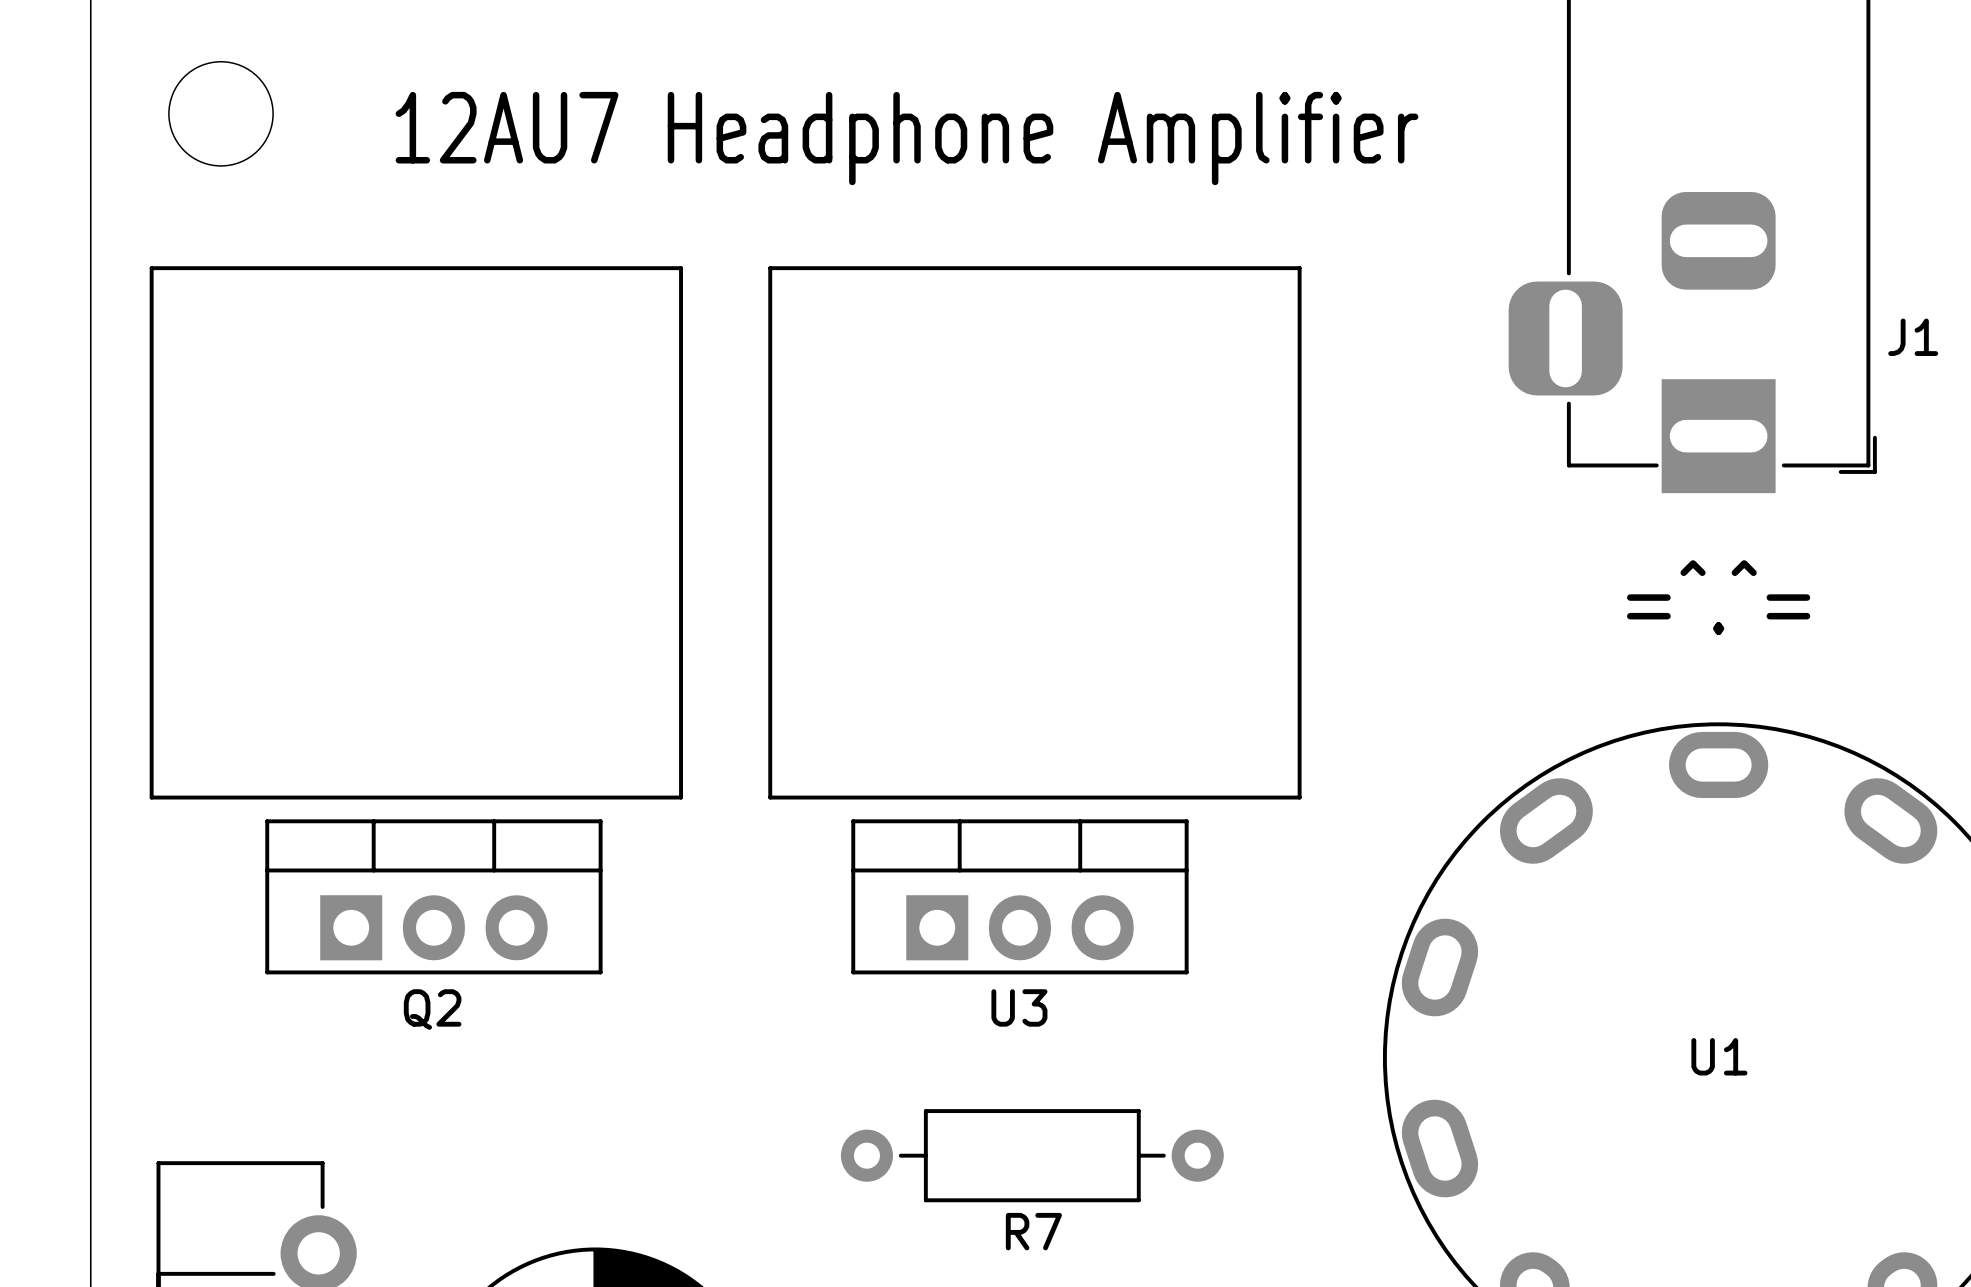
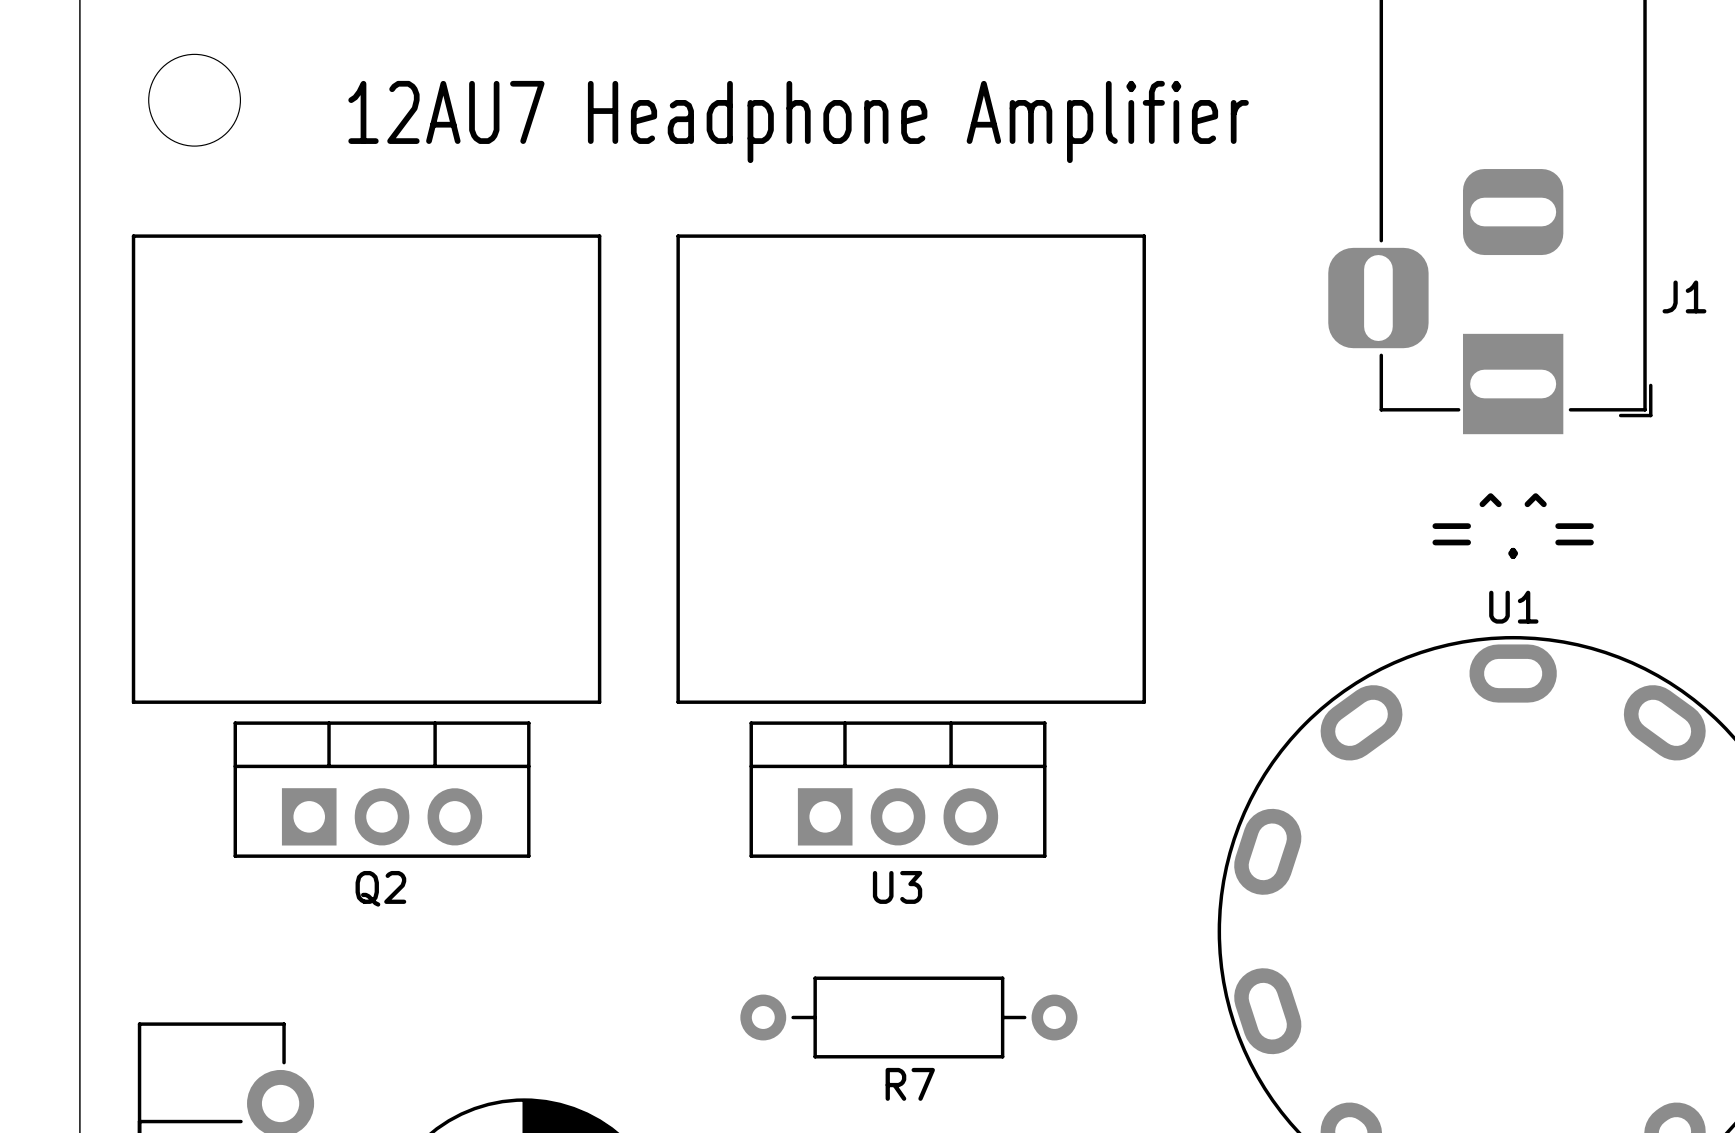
U1 name position: U1 (1719, 1056) -> U1 (1513, 607)

